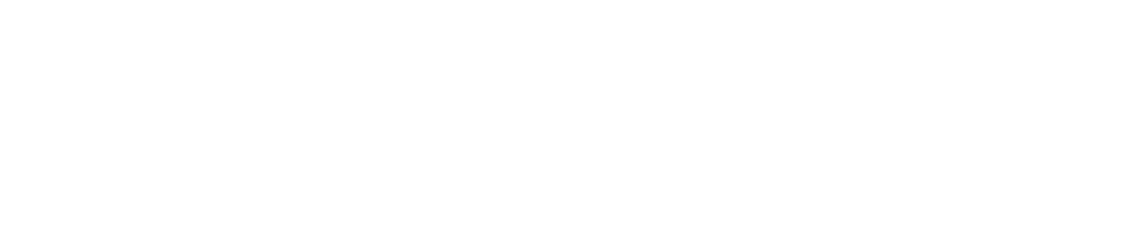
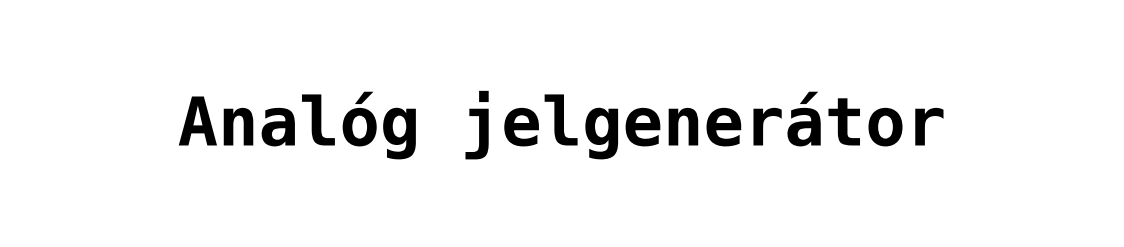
text: none -> Analóg jelgenerátor (561, 125)

